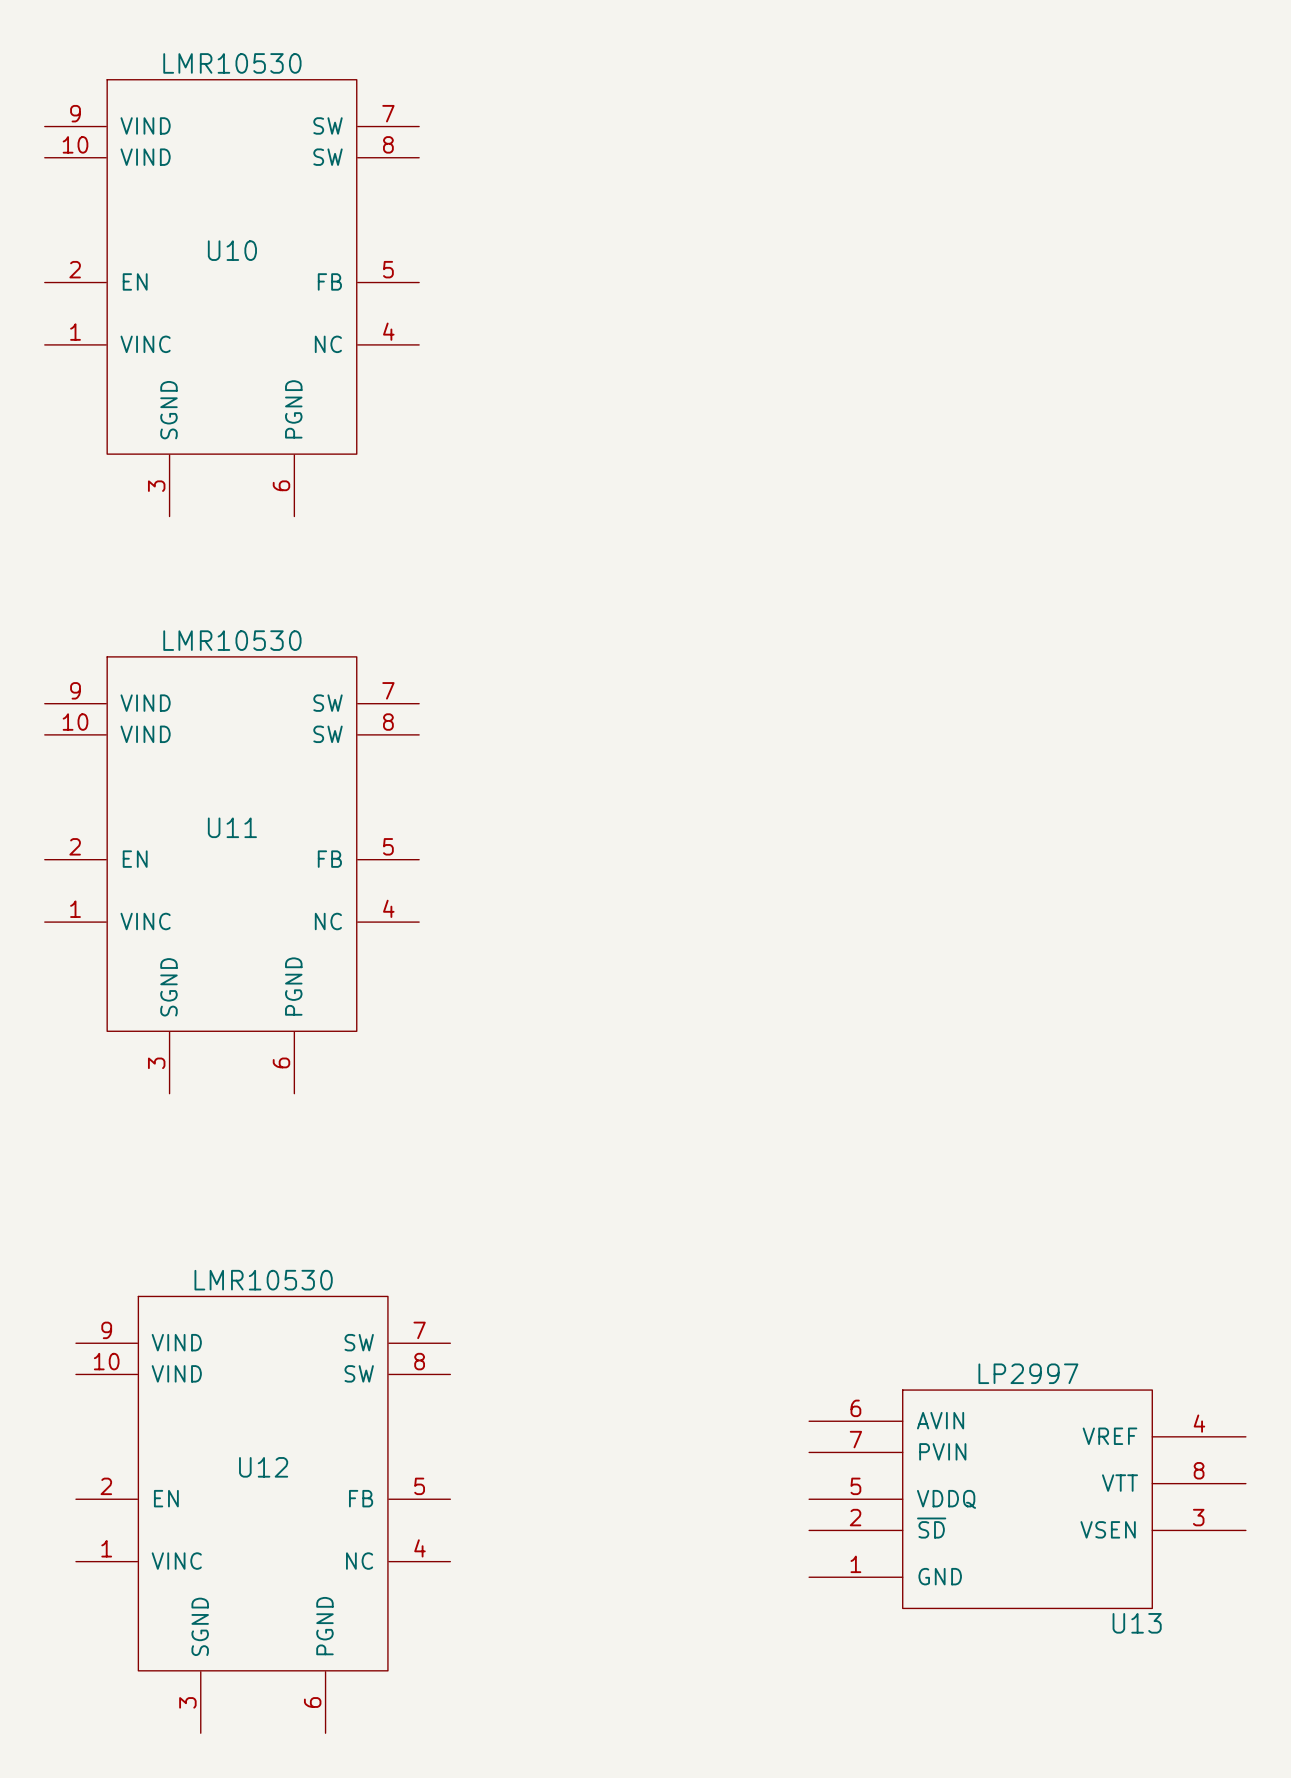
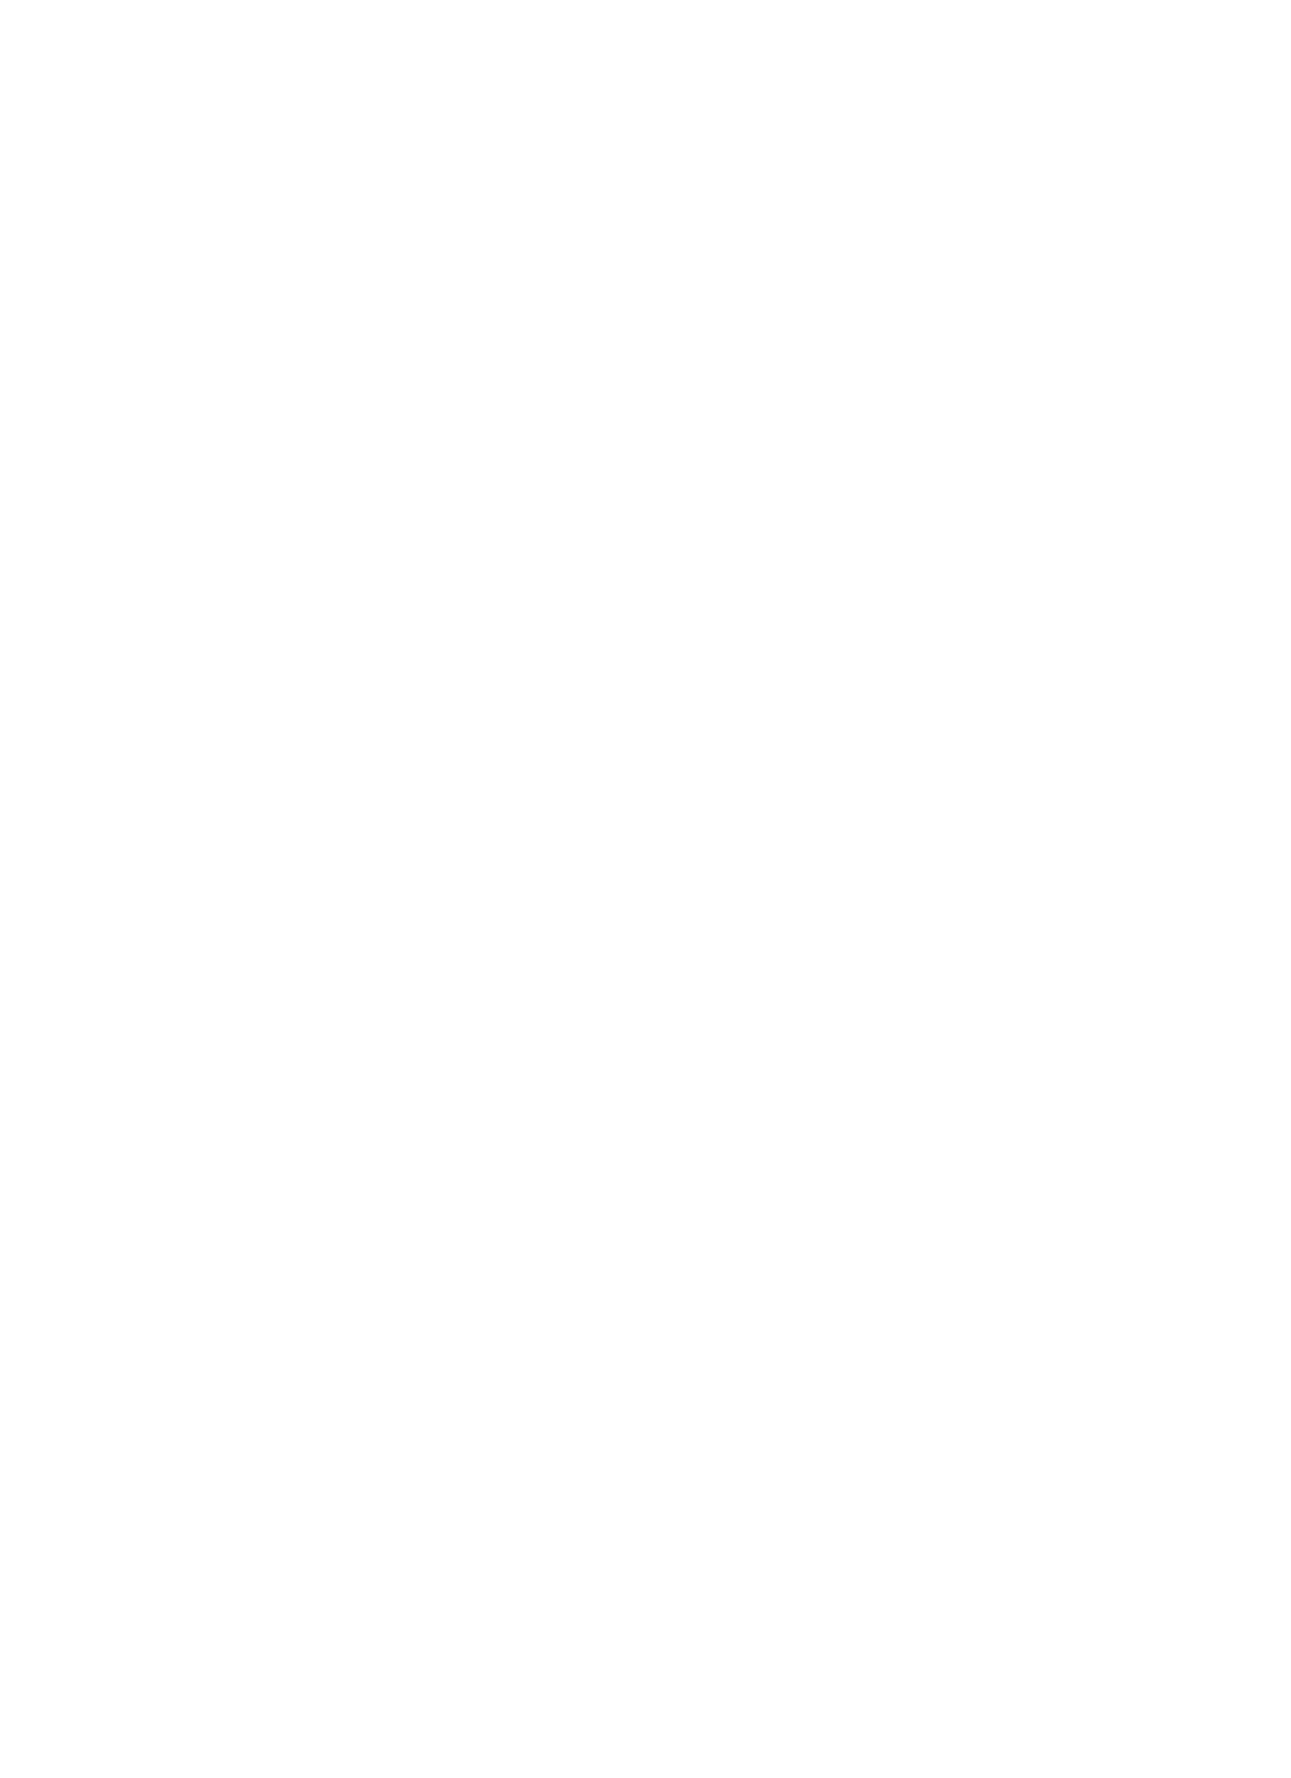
U10: LMR10530 (231, 298) -> none
U11: LMR10530 (231, 875) -> none
U13: LP2997 (1027, 1499) -> none
U12: LMR10530 (263, 1514) -> none

